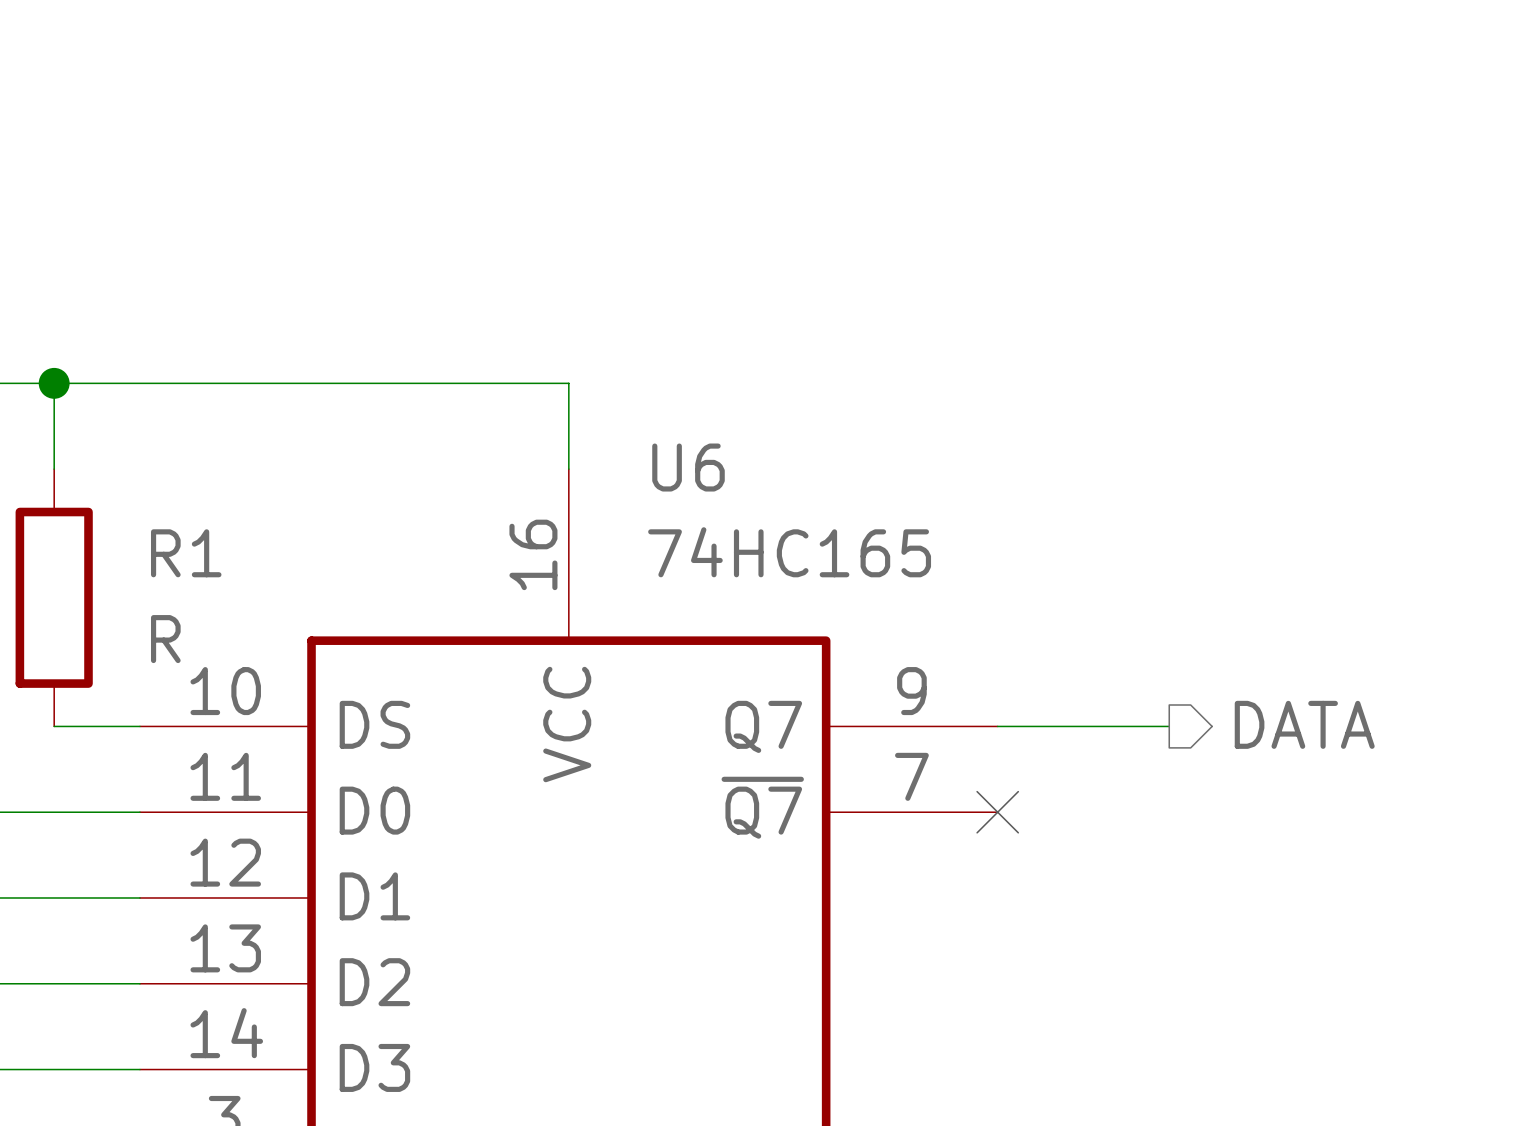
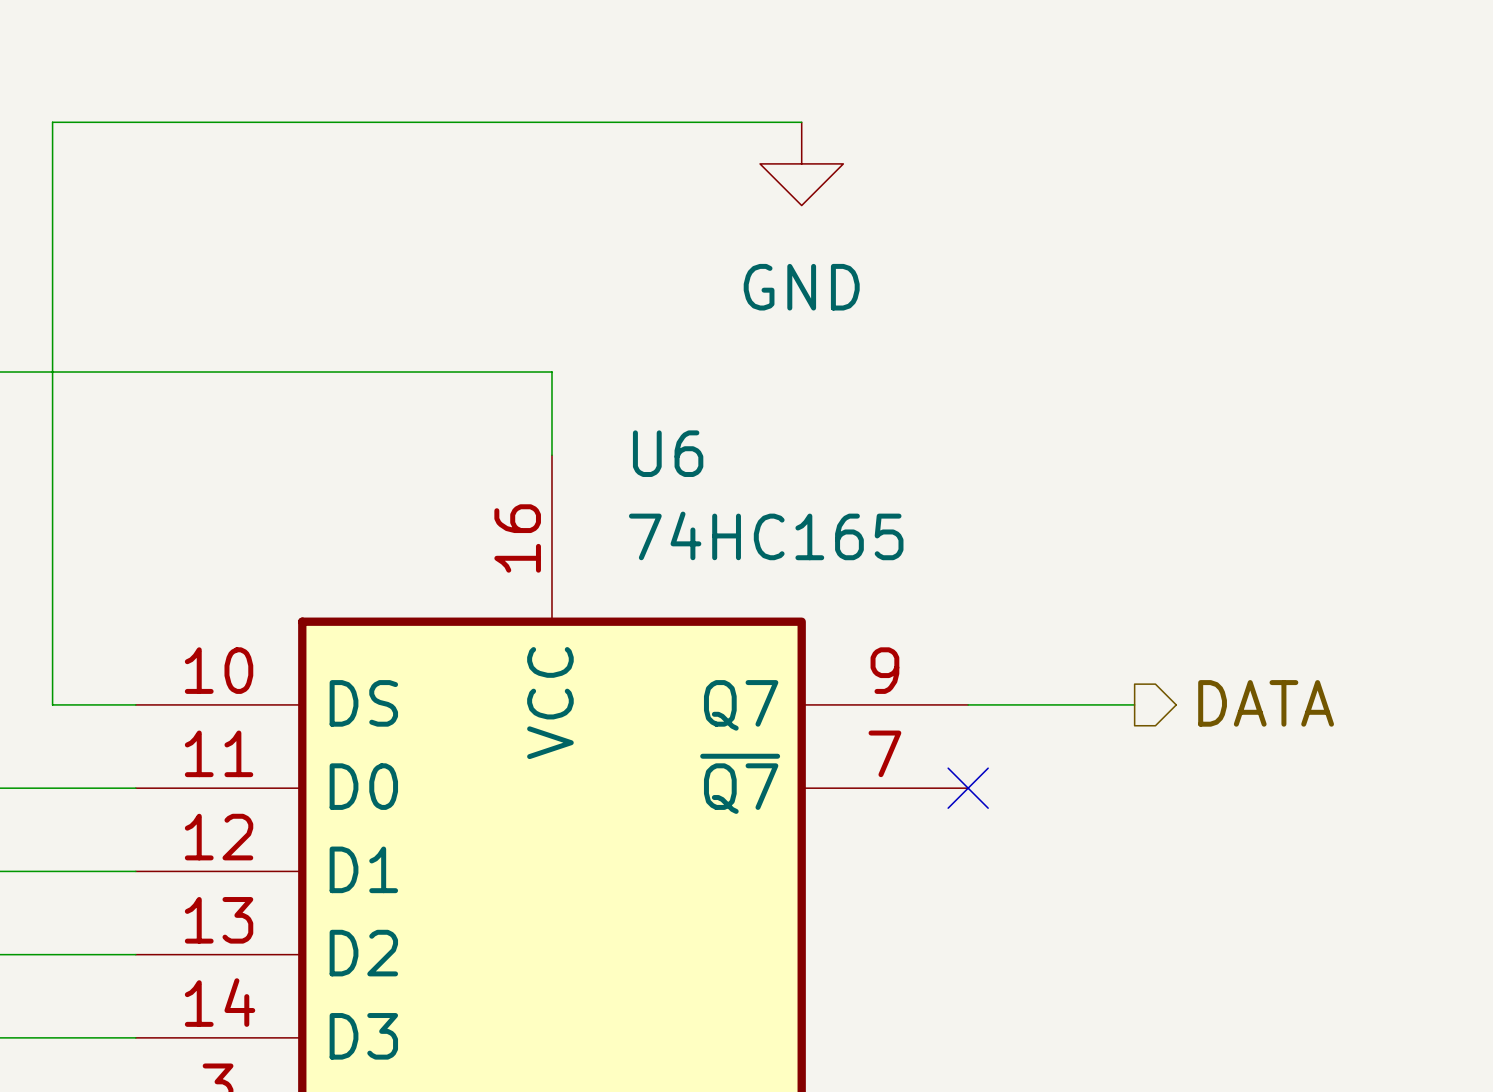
wire: none -> (801, 122) (52, 122) (52, 372)
power symbol: none -> GND (801, 163)
junction: (54, 383) -> none
wire: none -> (52, 455) (52, 704)
R1: R (54, 597) -> none

